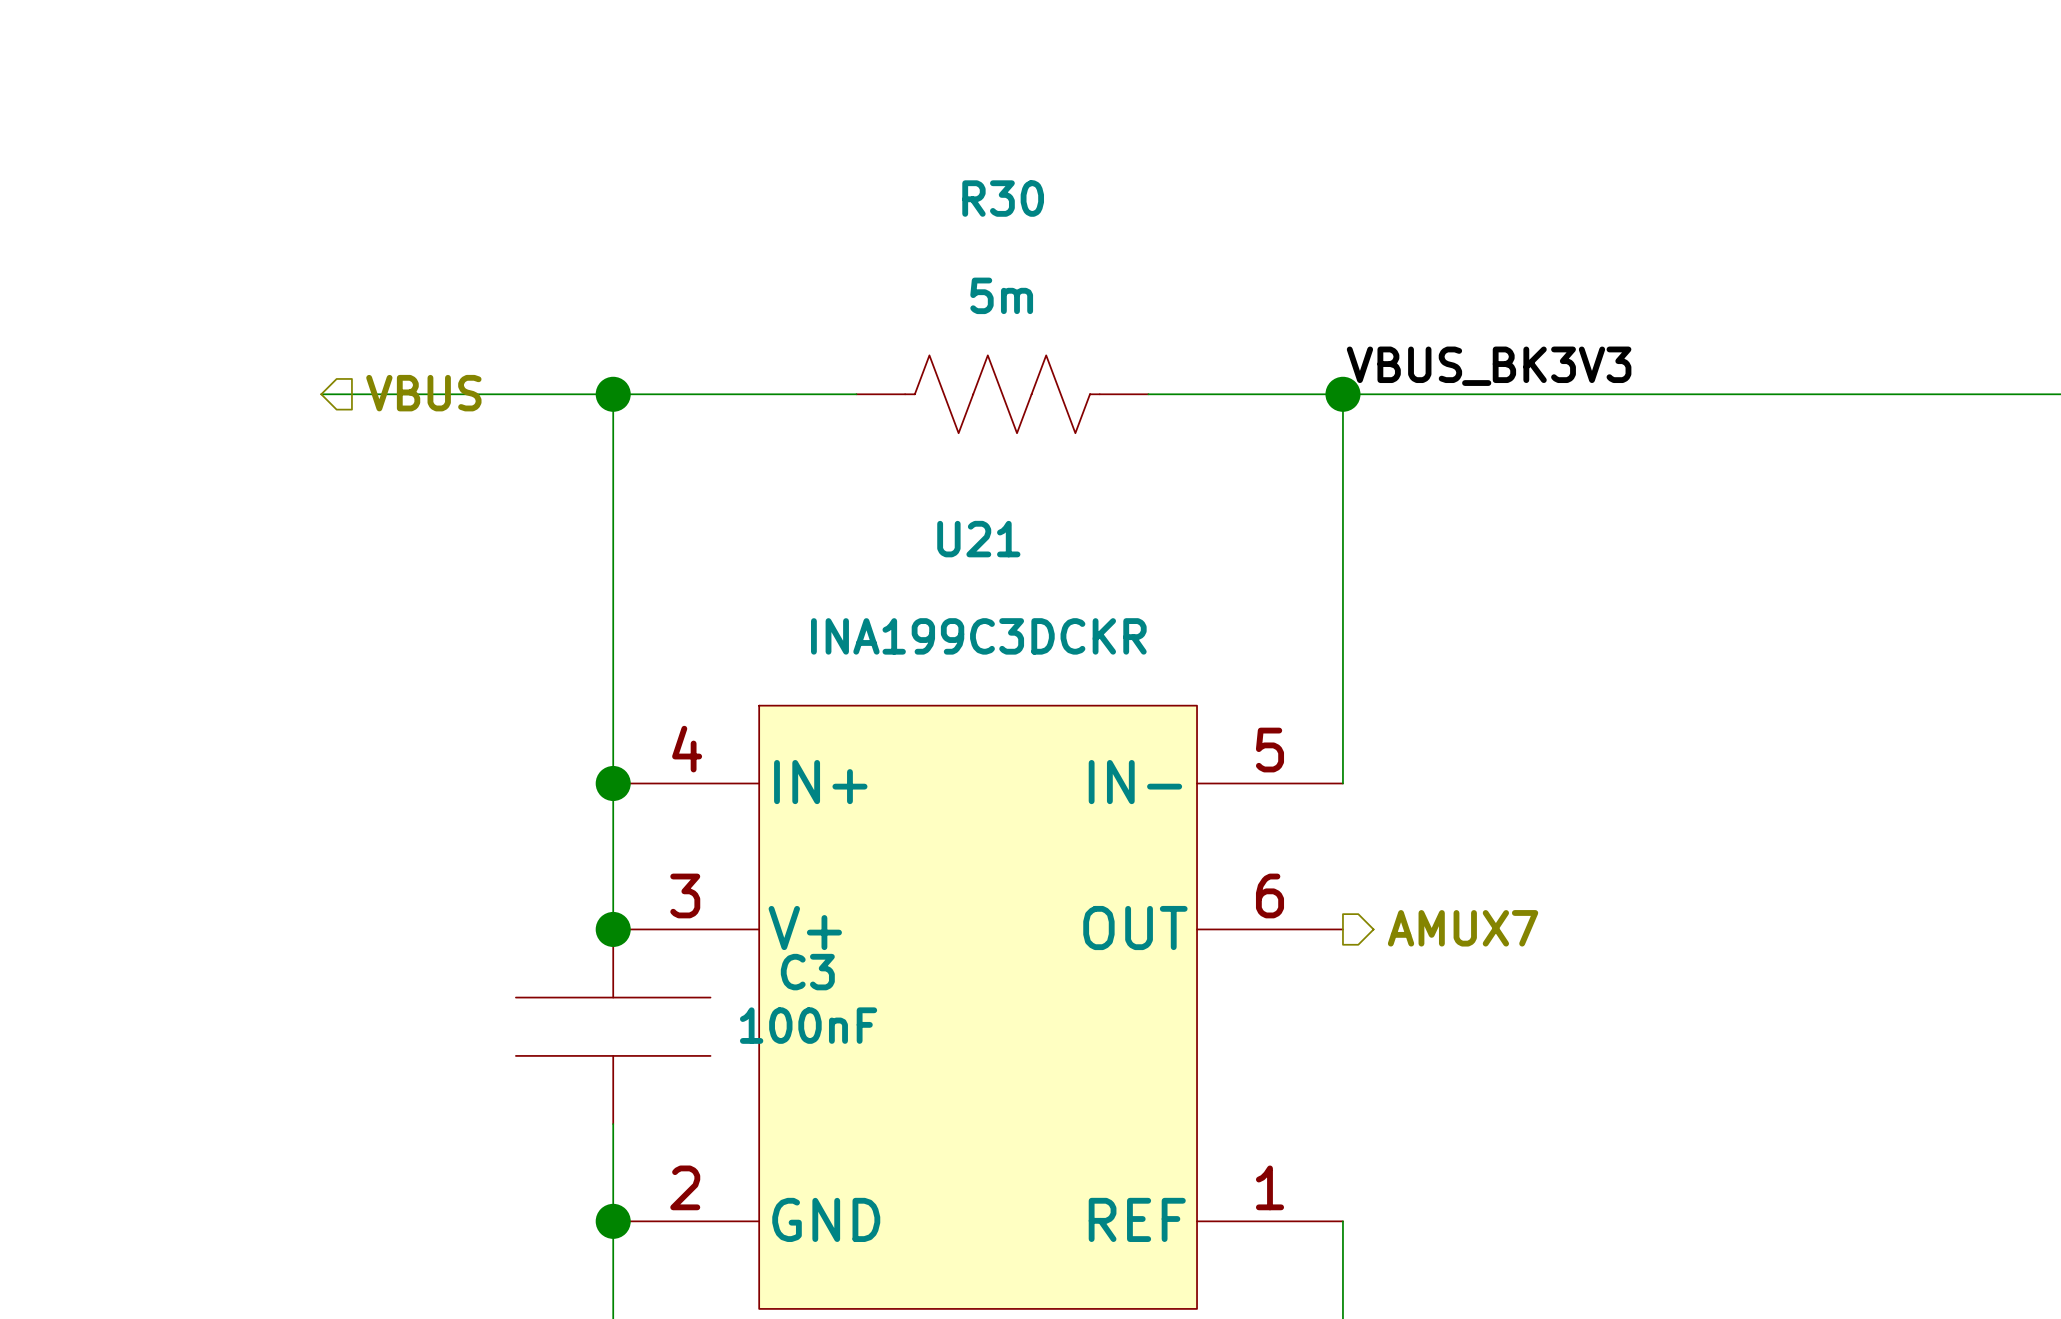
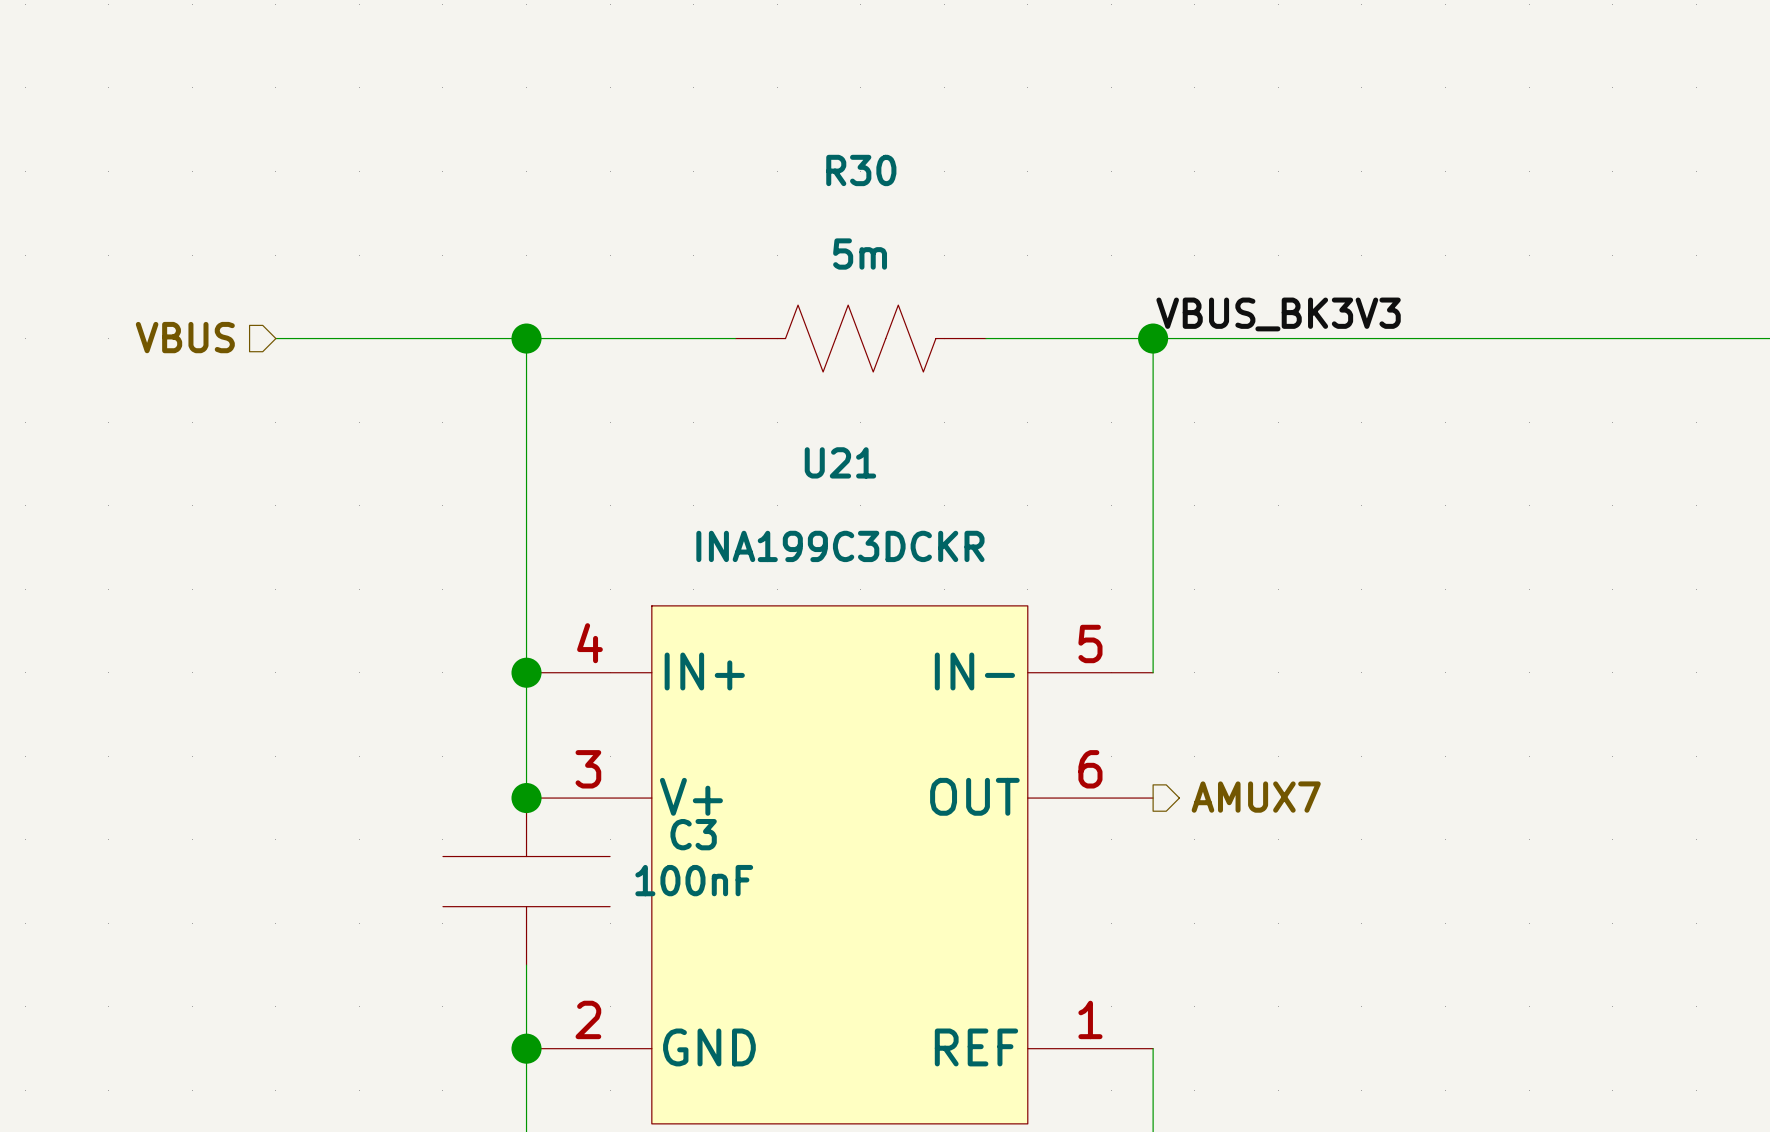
hierarchical label rotation: 0° (423, 393) -> 180° (185, 337)
hierarchical label position: VBUS (423, 393) -> VBUS (185, 337)

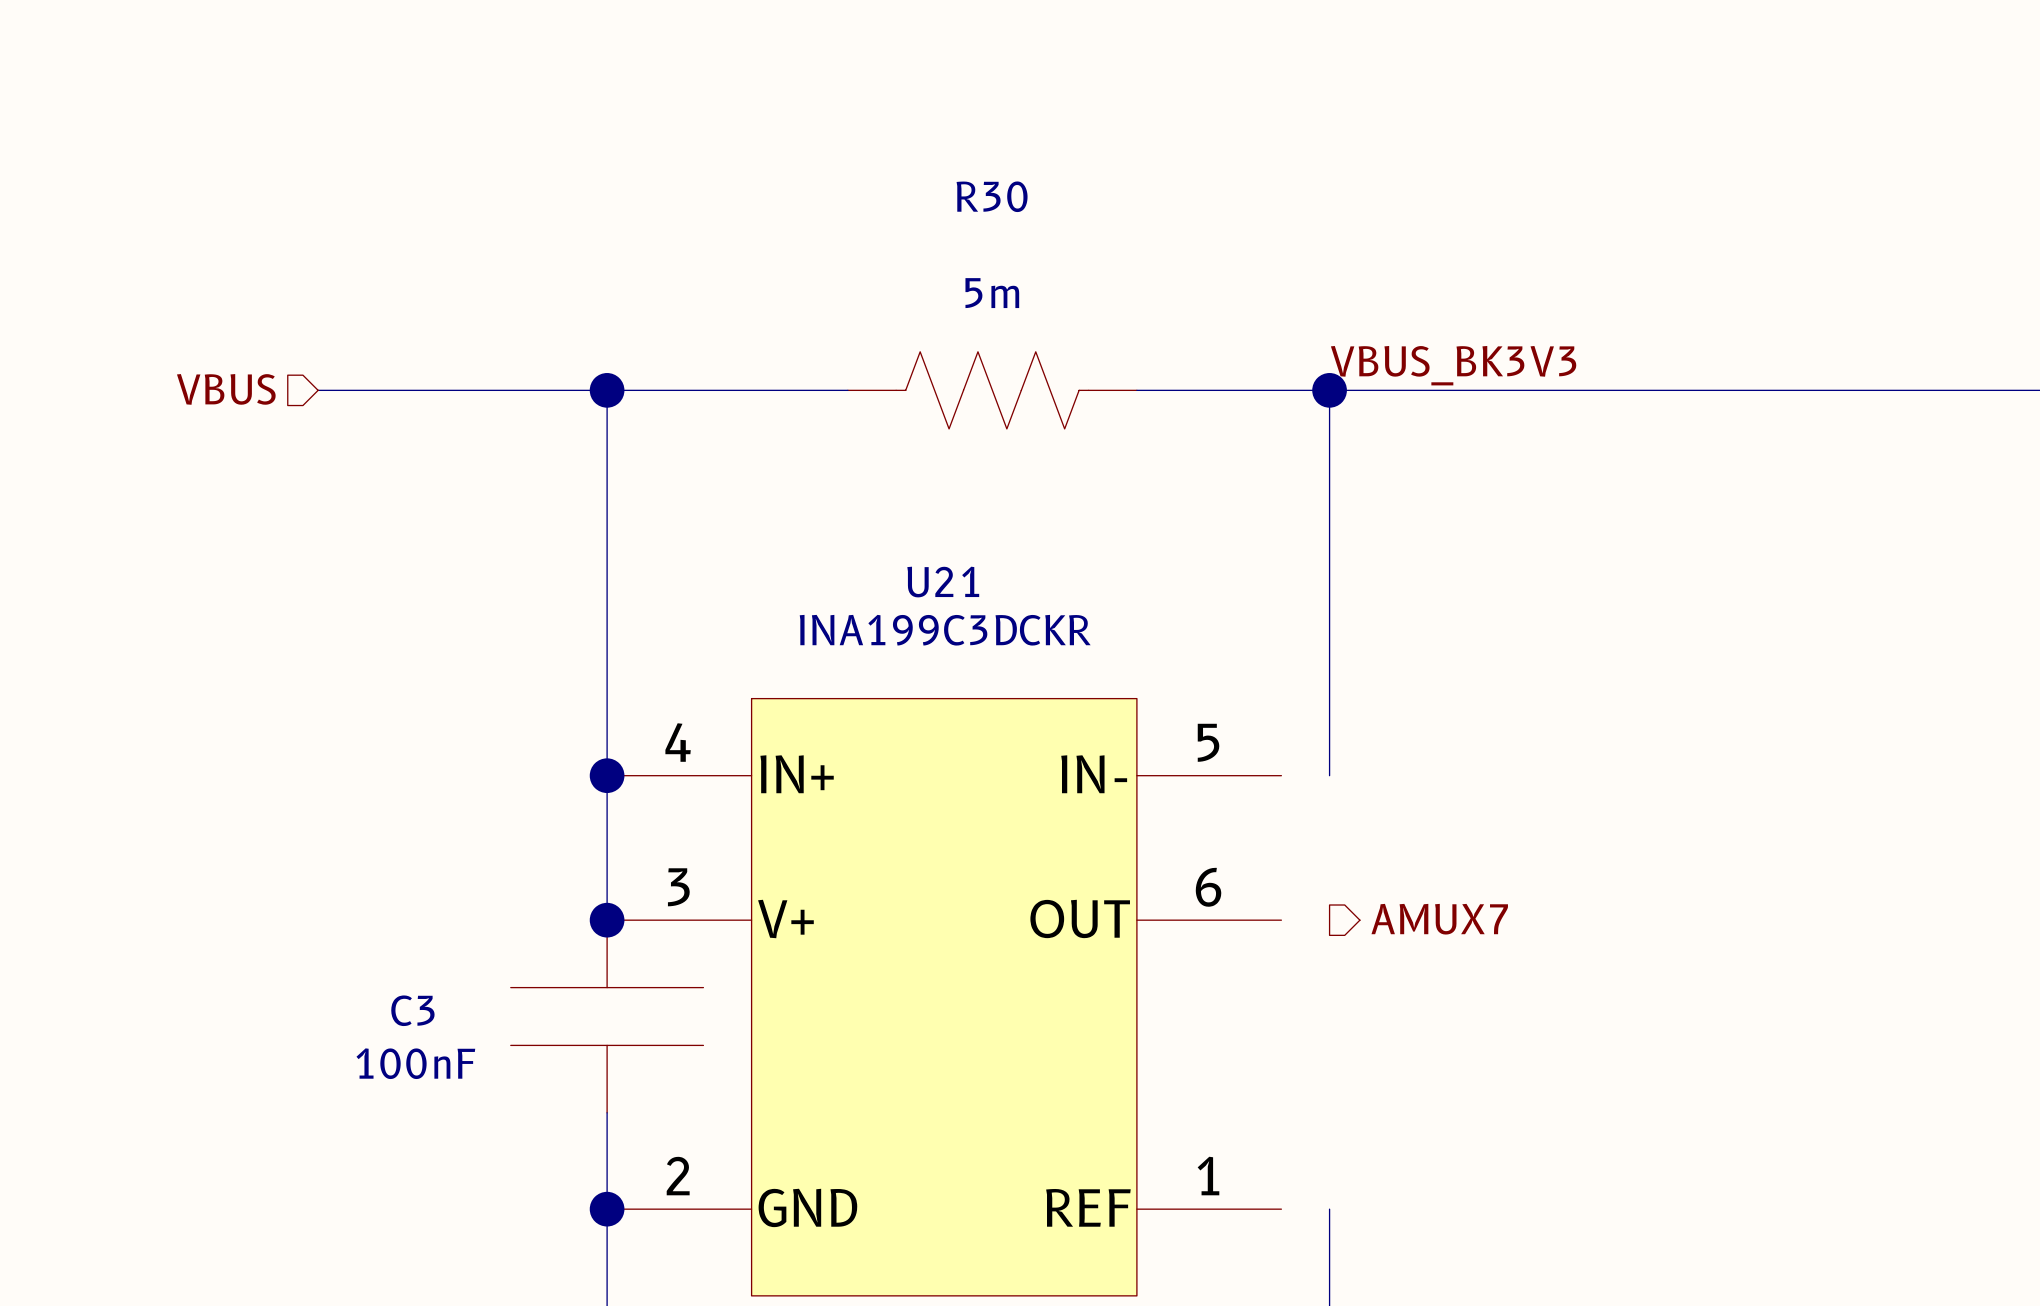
U21 symbol: [526, 605, 1154, 1124] -> [607, 698, 1282, 1296]
C3 name position: C3 (693, 834) -> C3 (412, 1010)
C3 value position: 100nF (694, 880) -> 100nF (415, 1063)

